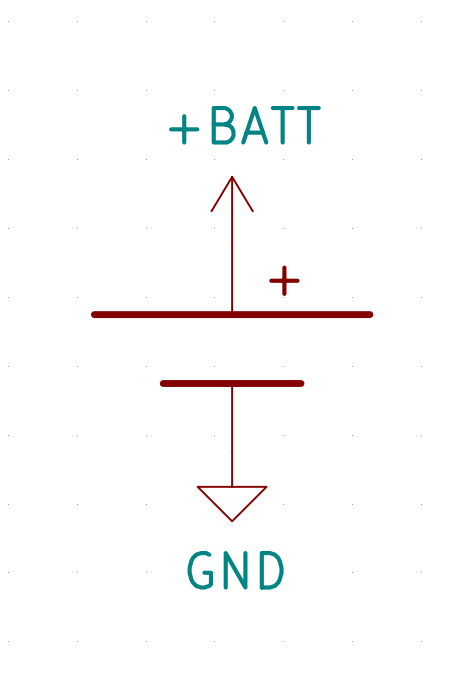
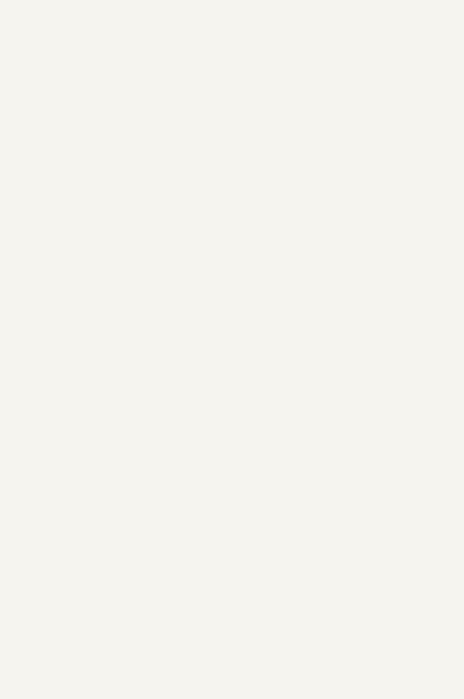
power symbol: +BATT (232, 211) -> none
part: (232, 349) -> none
power symbol: GND (232, 486) -> none

